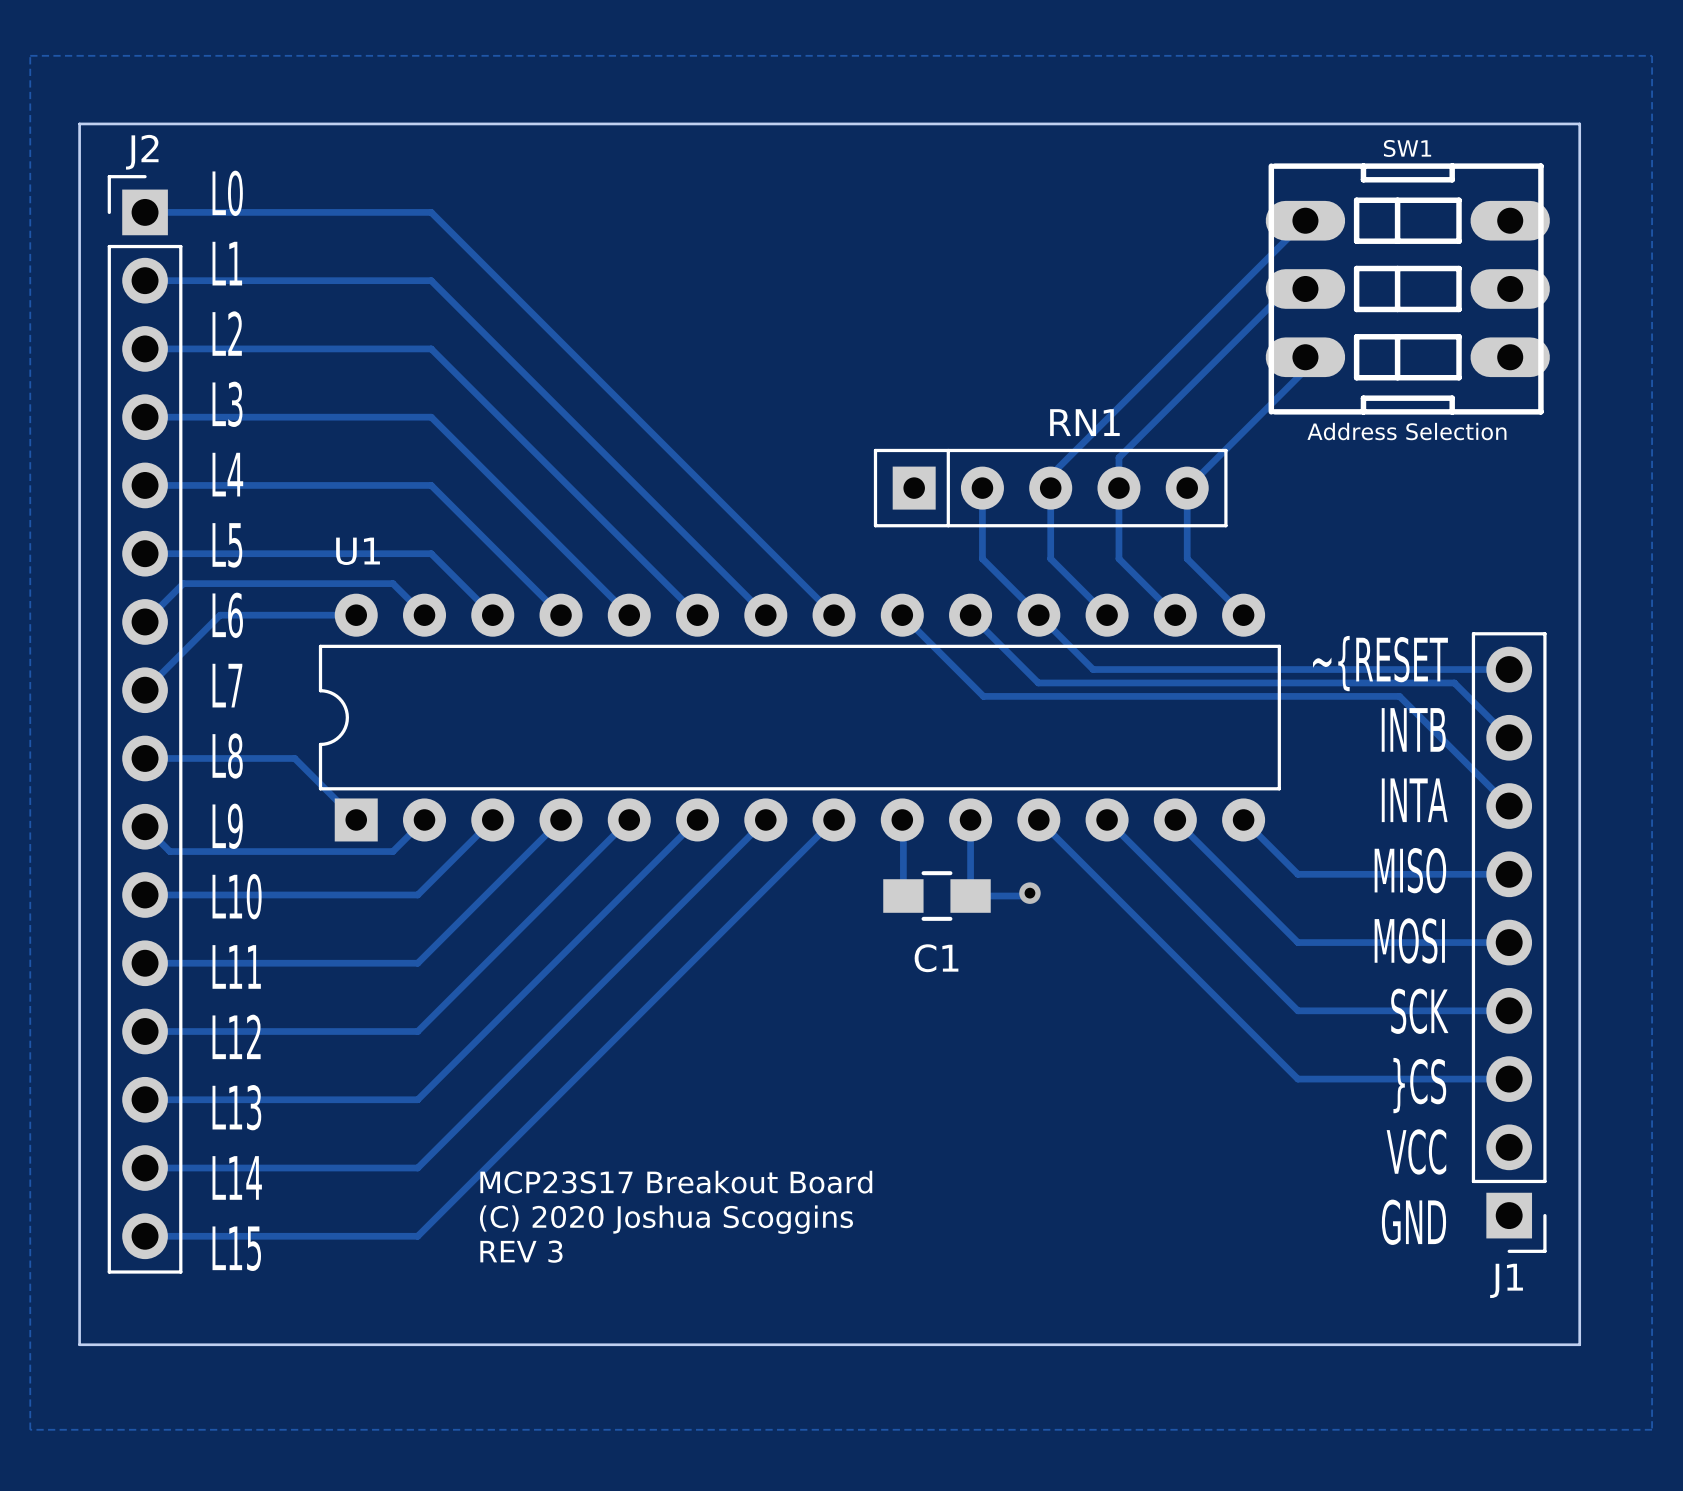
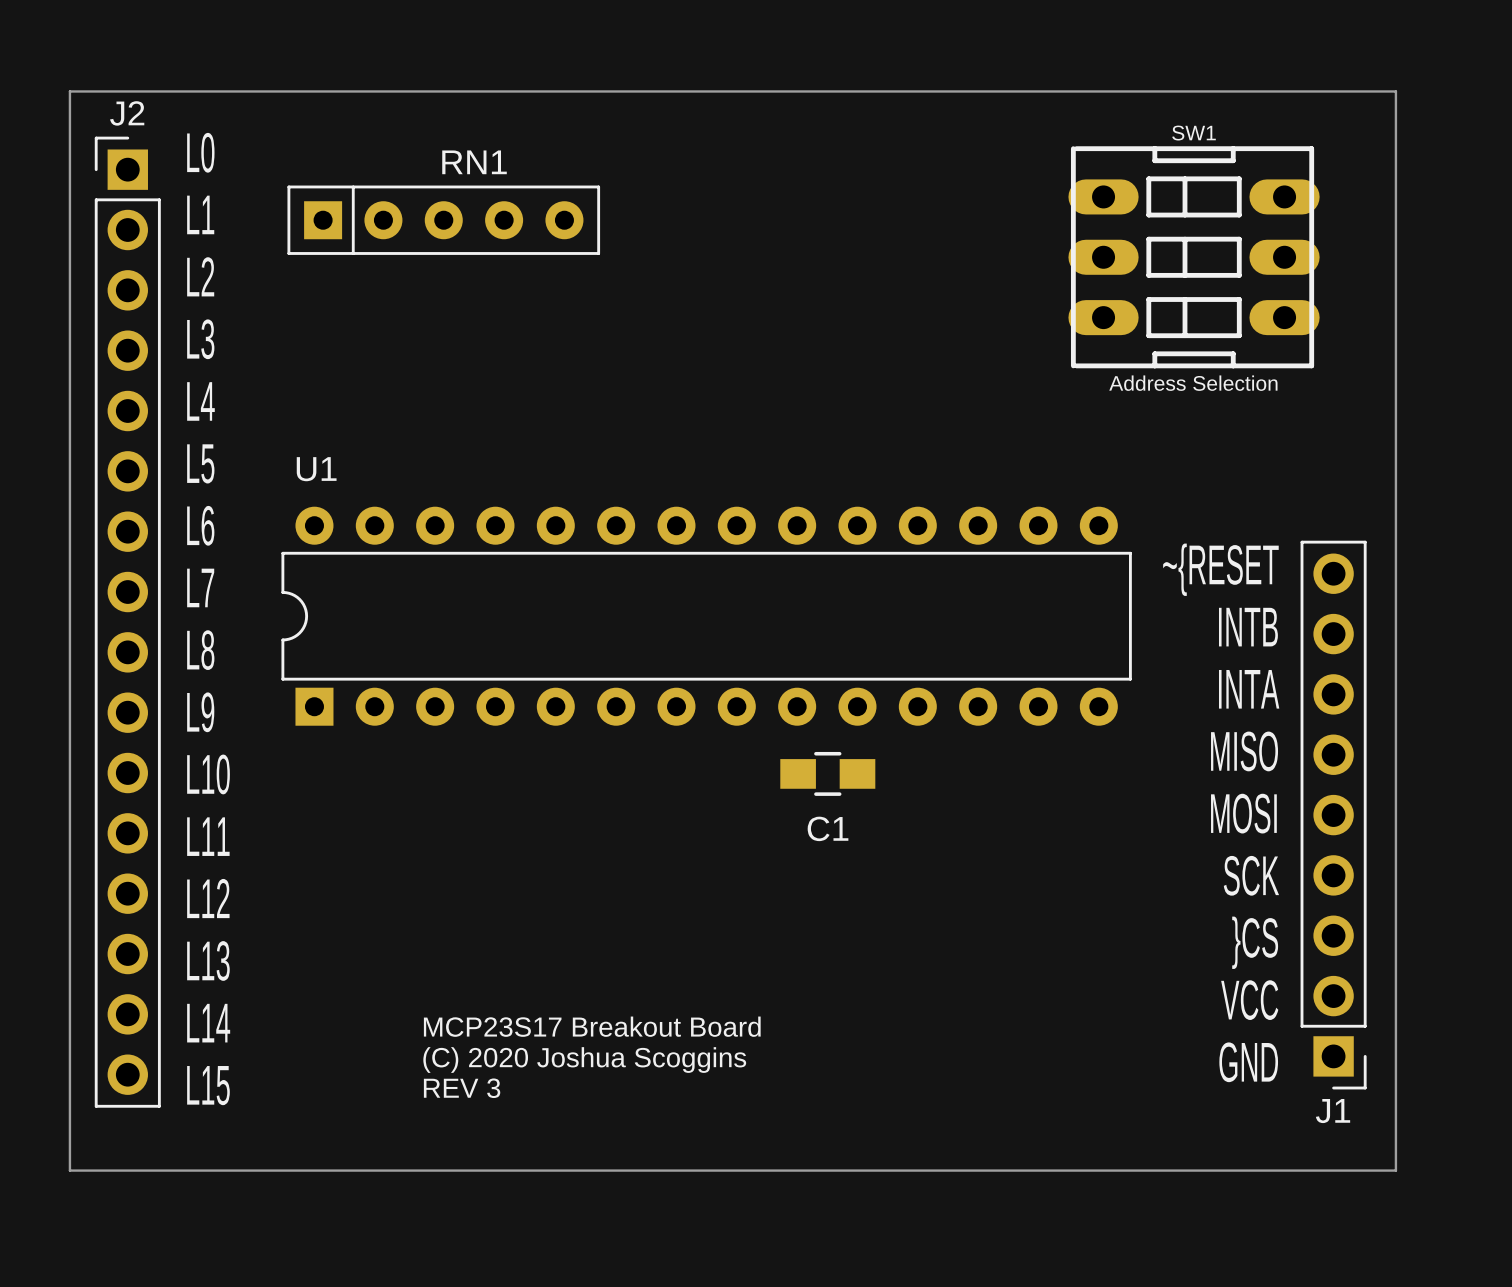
zone outline: (30, 55) (30, 1429) (1652, 1429) (1652, 55) (30, 55) -> none
track: (145, 212) (431, 212) (834, 615) -> none
track: (1305, 220) (1050, 475) (1050, 558) (1107, 615) -> none
track: (145, 280) (431, 280) (765, 615) -> none
track: (1305, 288) (1287, 288) (1118, 457) (1118, 558) (1175, 615) -> none
SW1 position: (1407, 288) -> (1194, 257)
track: (145, 348) (431, 348) (697, 615) -> none
track: (1305, 357) (1305, 369) (1187, 488) (1187, 558) (1243, 615) -> none
track: (145, 417) (431, 417) (629, 615) -> none
track: (145, 485) (431, 485) (561, 615) -> none
track: (982, 488) (982, 558) (1093, 669) (1509, 669) -> none
RN1 position: (1050, 488) -> (443, 220)
track: (145, 553) (431, 553) (492, 615) -> none
track: (356, 615) (220, 615) (145, 690) -> none
track: (424, 615) (392, 583) (183, 583) (145, 621) -> none
track: (902, 615) (983, 696) (1399, 696) (1509, 806) -> none
track: (970, 615) (1038, 682) (1454, 682) (1509, 737) -> none
track: (145, 758) (294, 758) (356, 819) -> none
track: (424, 819) (392, 851) (169, 851) (145, 826) -> none
track: (492, 819) (417, 894) (145, 894) -> none
track: (561, 819) (417, 963) (145, 963) -> none
track: (629, 819) (417, 1031) (145, 1031) -> none
track: (697, 819) (417, 1099) (145, 1099) -> none
track: (765, 819) (417, 1168) (145, 1168) -> none
track: (834, 819) (417, 1236) (145, 1236) -> none
track: (902, 819) (903, 896) -> none
track: (970, 819) (970, 896) (1027, 896) (1029, 893) -> none
track: (1038, 819) (1297, 1079) (1509, 1079) -> none
track: (1107, 819) (1297, 1010) (1509, 1010) -> none
track: (1175, 819) (1297, 942) (1509, 942) -> none
track: (1243, 819) (1297, 874) (1509, 874) -> none
via: (1029, 893) -> none

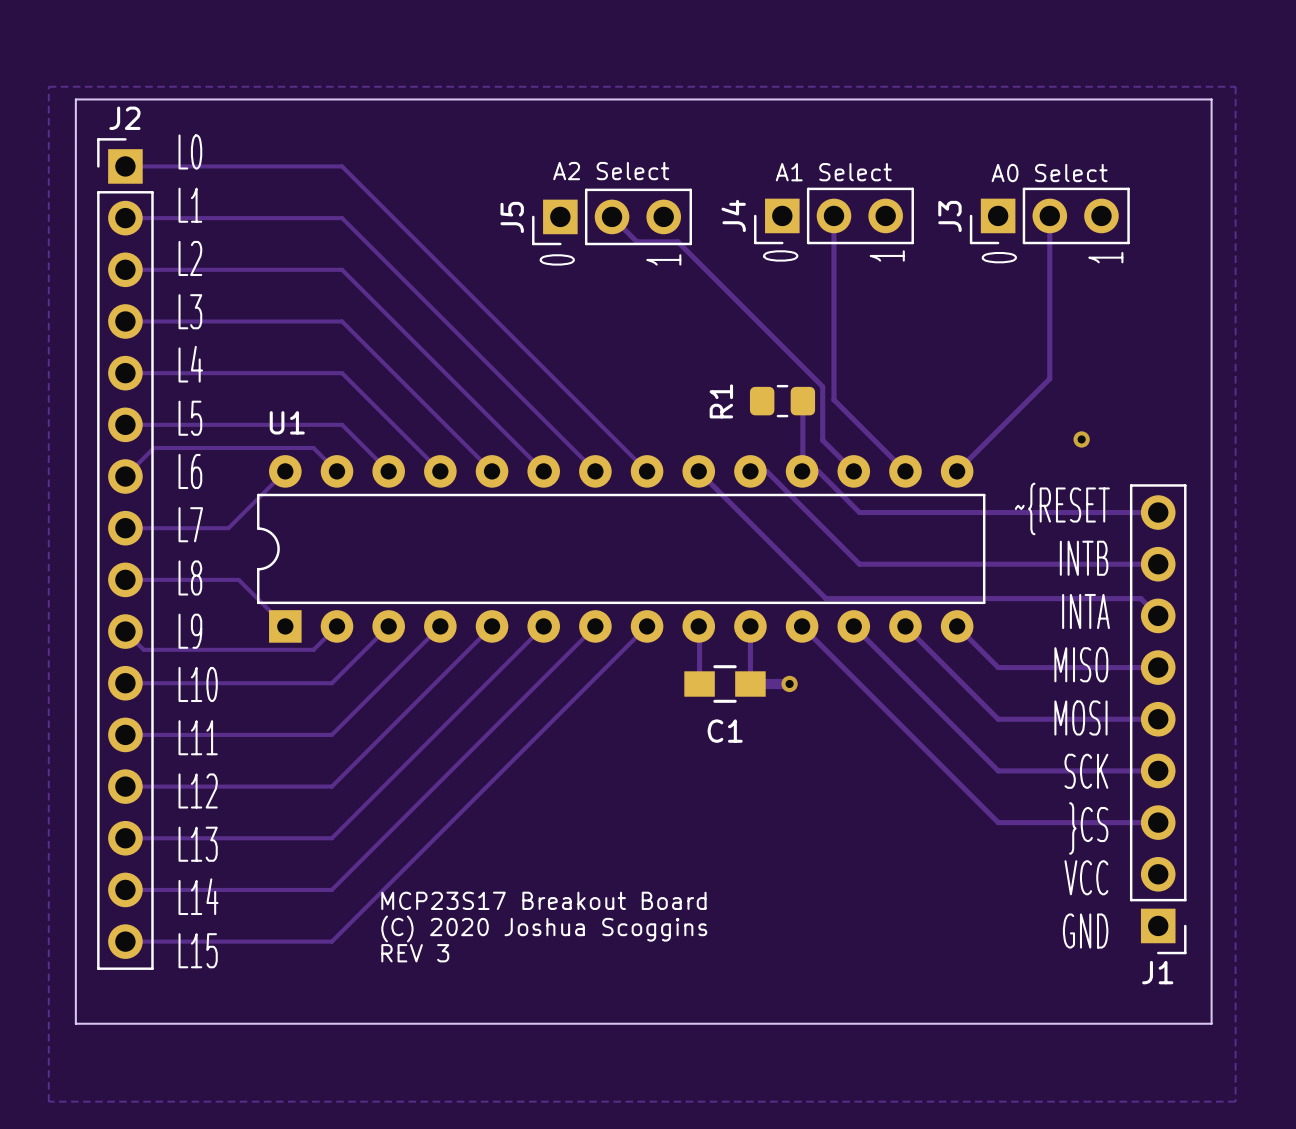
zone outline: none -> (48, 86) (48, 1101) (1235, 1101) (1235, 86) (48, 86)
track: none -> (125, 166) (342, 166) (647, 471)
text: none -> A2 Select (611, 171)
text: none -> A1 Select (833, 172)
text: none -> A0 Select (1049, 173)
RN1: (443, 220) -> none
track: none -> (833, 215) (833, 399) (905, 471)
J4: none -> (833, 215)
track: none -> (1049, 215) (1049, 378) (957, 471)
J3: none -> (1049, 215)
track: none -> (612, 216) (636, 241) (677, 241) (822, 386) (822, 440) (853, 471)
J5: none -> (612, 216)
track: none -> (125, 218) (342, 218) (595, 471)
SW1: Address Selection (1194, 257) -> none
text: none -> 1 (887, 255)
text: none -> 0 (780, 255)
text: none -> 1 (1105, 257)
text: none -> 0 (999, 257)
text: none -> 0 (557, 259)
text: none -> 1 (663, 259)
track: none -> (125, 269) (342, 269) (543, 471)
track: none -> (125, 321) (342, 321) (492, 471)
track: none -> (125, 373) (342, 373) (440, 471)
R1: none -> (782, 401)
track: none -> (802, 401) (802, 471) (818, 471) (859, 512) (1158, 512)
track: none -> (125, 424) (342, 424) (388, 471)
via: none -> (1081, 439)
track: none -> (285, 471) (228, 528) (125, 528)
track: none -> (336, 471) (313, 448) (153, 448) (125, 476)
track: none -> (698, 471) (825, 598) (1140, 598) (1158, 615)
track: none -> (750, 471) (766, 471) (859, 564) (1158, 564)
track: none -> (125, 579) (238, 579) (285, 626)
track: none -> (336, 626) (313, 649) (143, 649) (125, 631)
track: none -> (388, 626) (331, 683) (125, 683)
track: none -> (440, 626) (331, 734) (125, 734)
track: none -> (492, 626) (331, 786) (125, 786)
track: none -> (543, 626) (331, 838) (125, 838)
track: none -> (595, 626) (331, 889) (125, 889)
track: none -> (647, 626) (331, 941) (125, 941)
track: none -> (698, 626) (699, 684)
track: none -> (750, 626) (750, 684) (789, 684)
track: none -> (802, 626) (998, 822) (1158, 822)
track: none -> (853, 626) (998, 770) (1158, 770)
track: none -> (905, 626) (998, 719) (1158, 719)
track: none -> (957, 626) (998, 667) (1158, 667)
via: none -> (789, 683)

